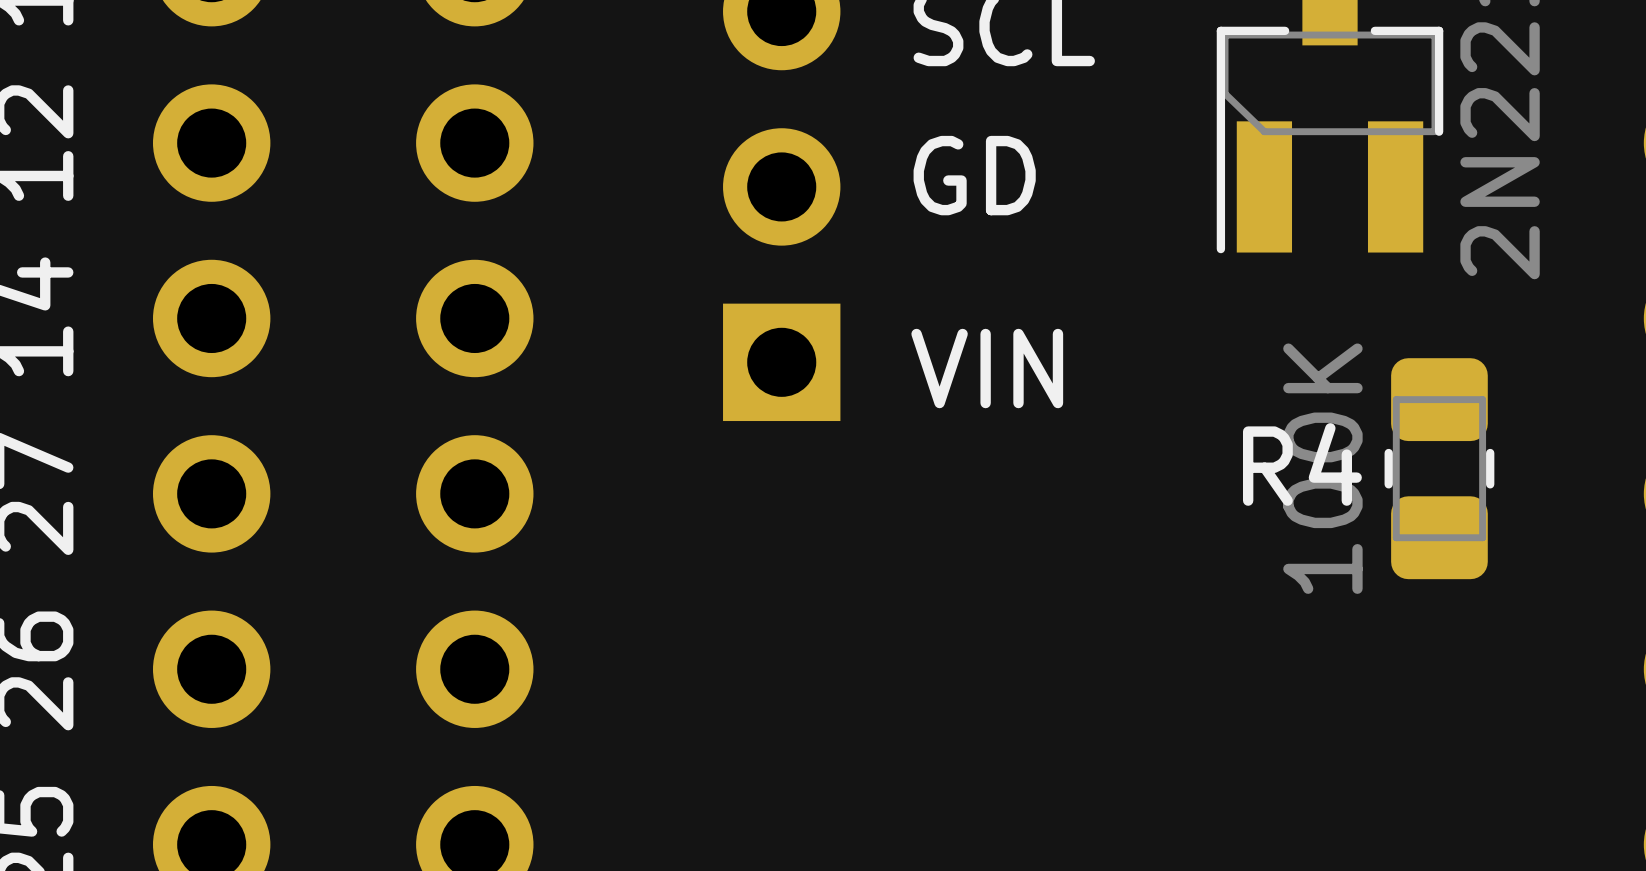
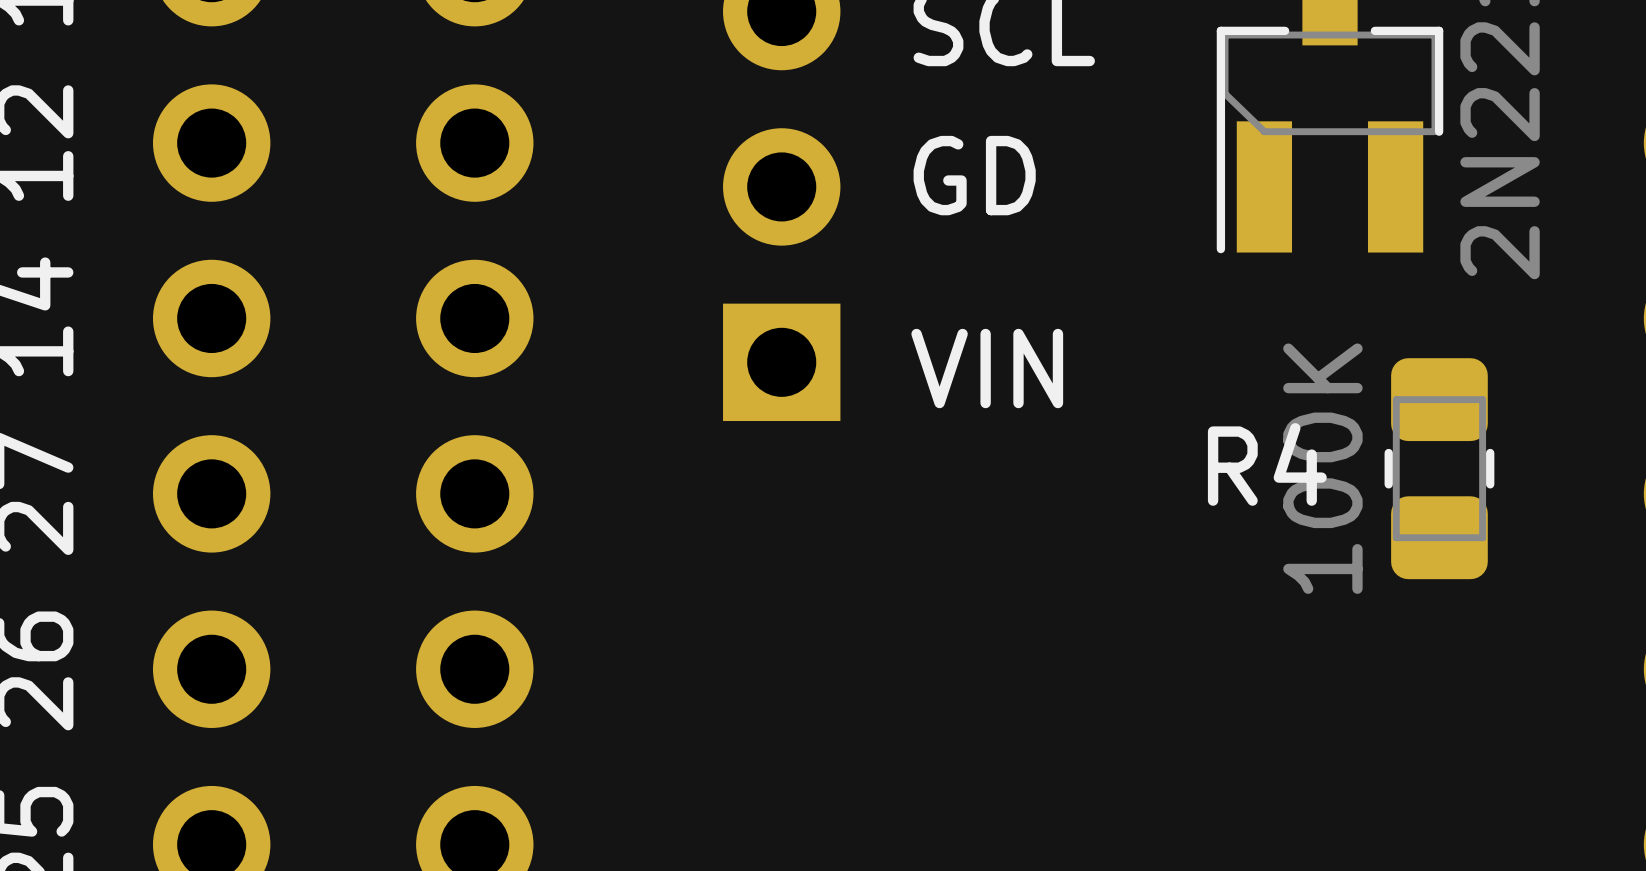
R4 name position: R4 (1302, 464) -> R4 (1267, 464)

